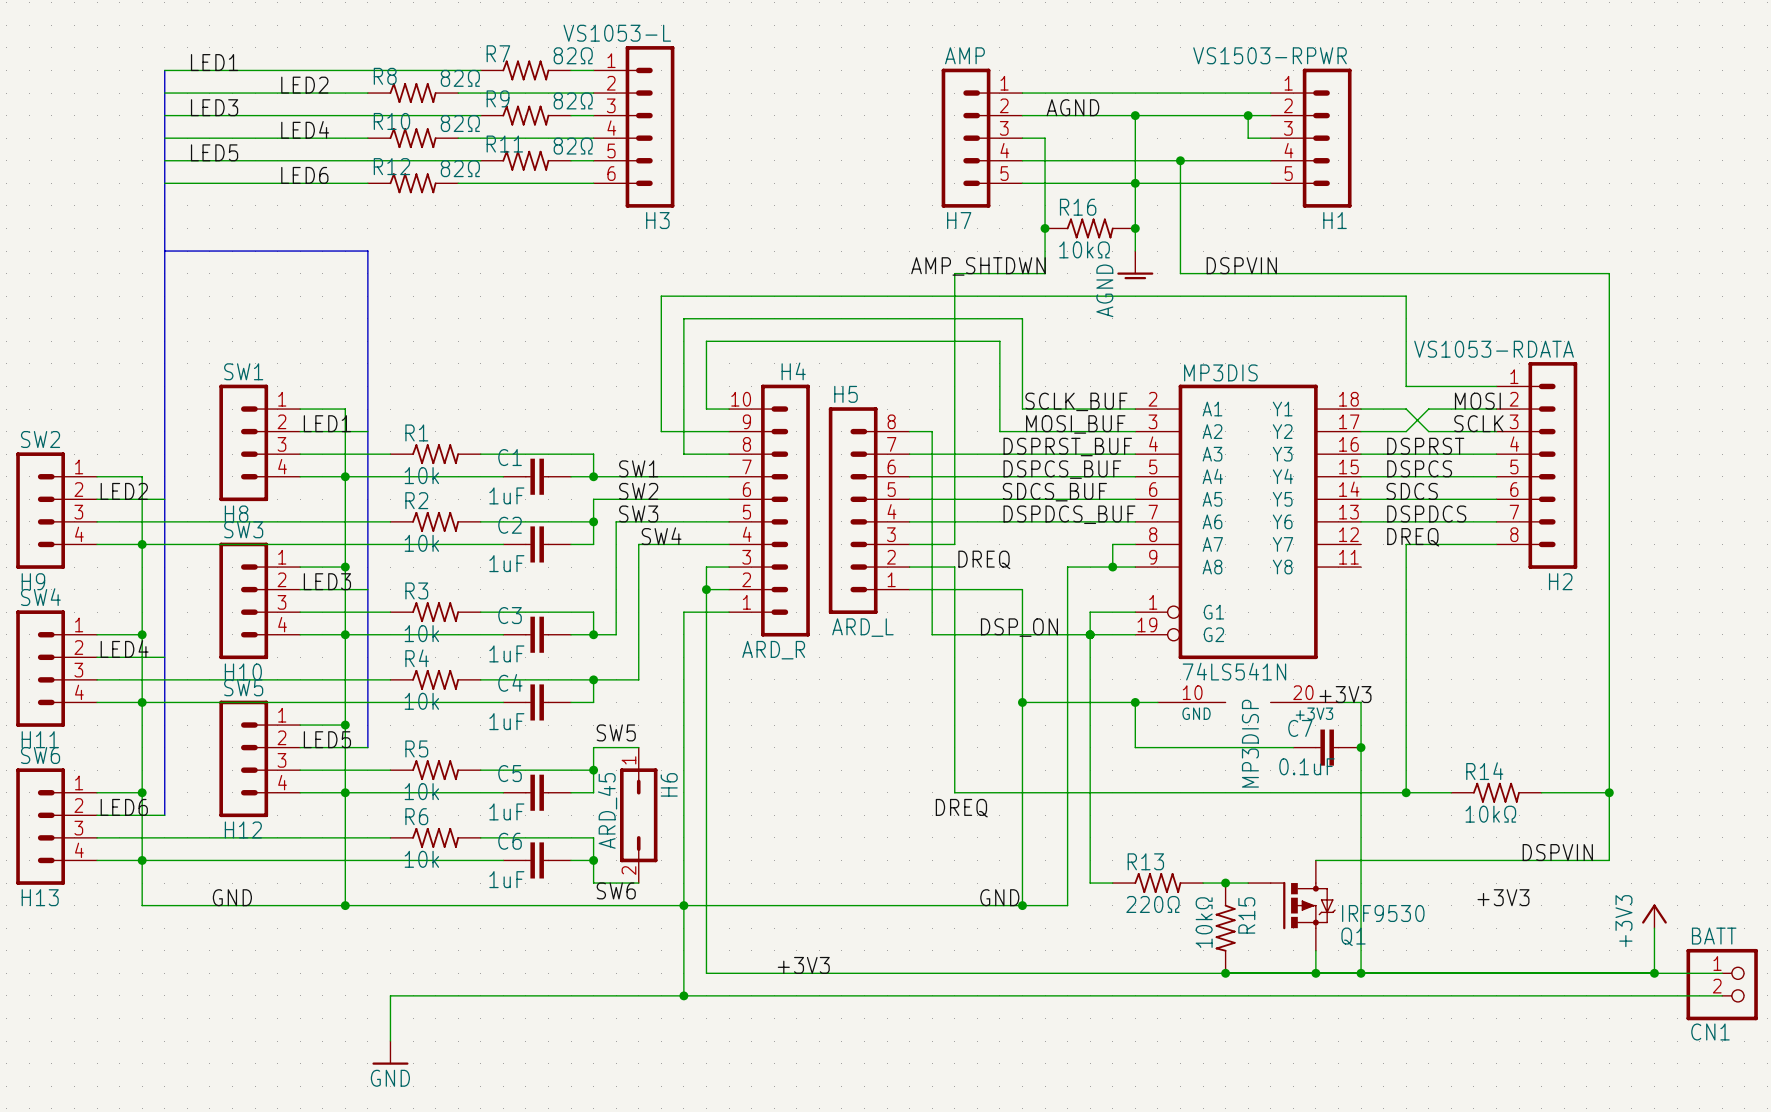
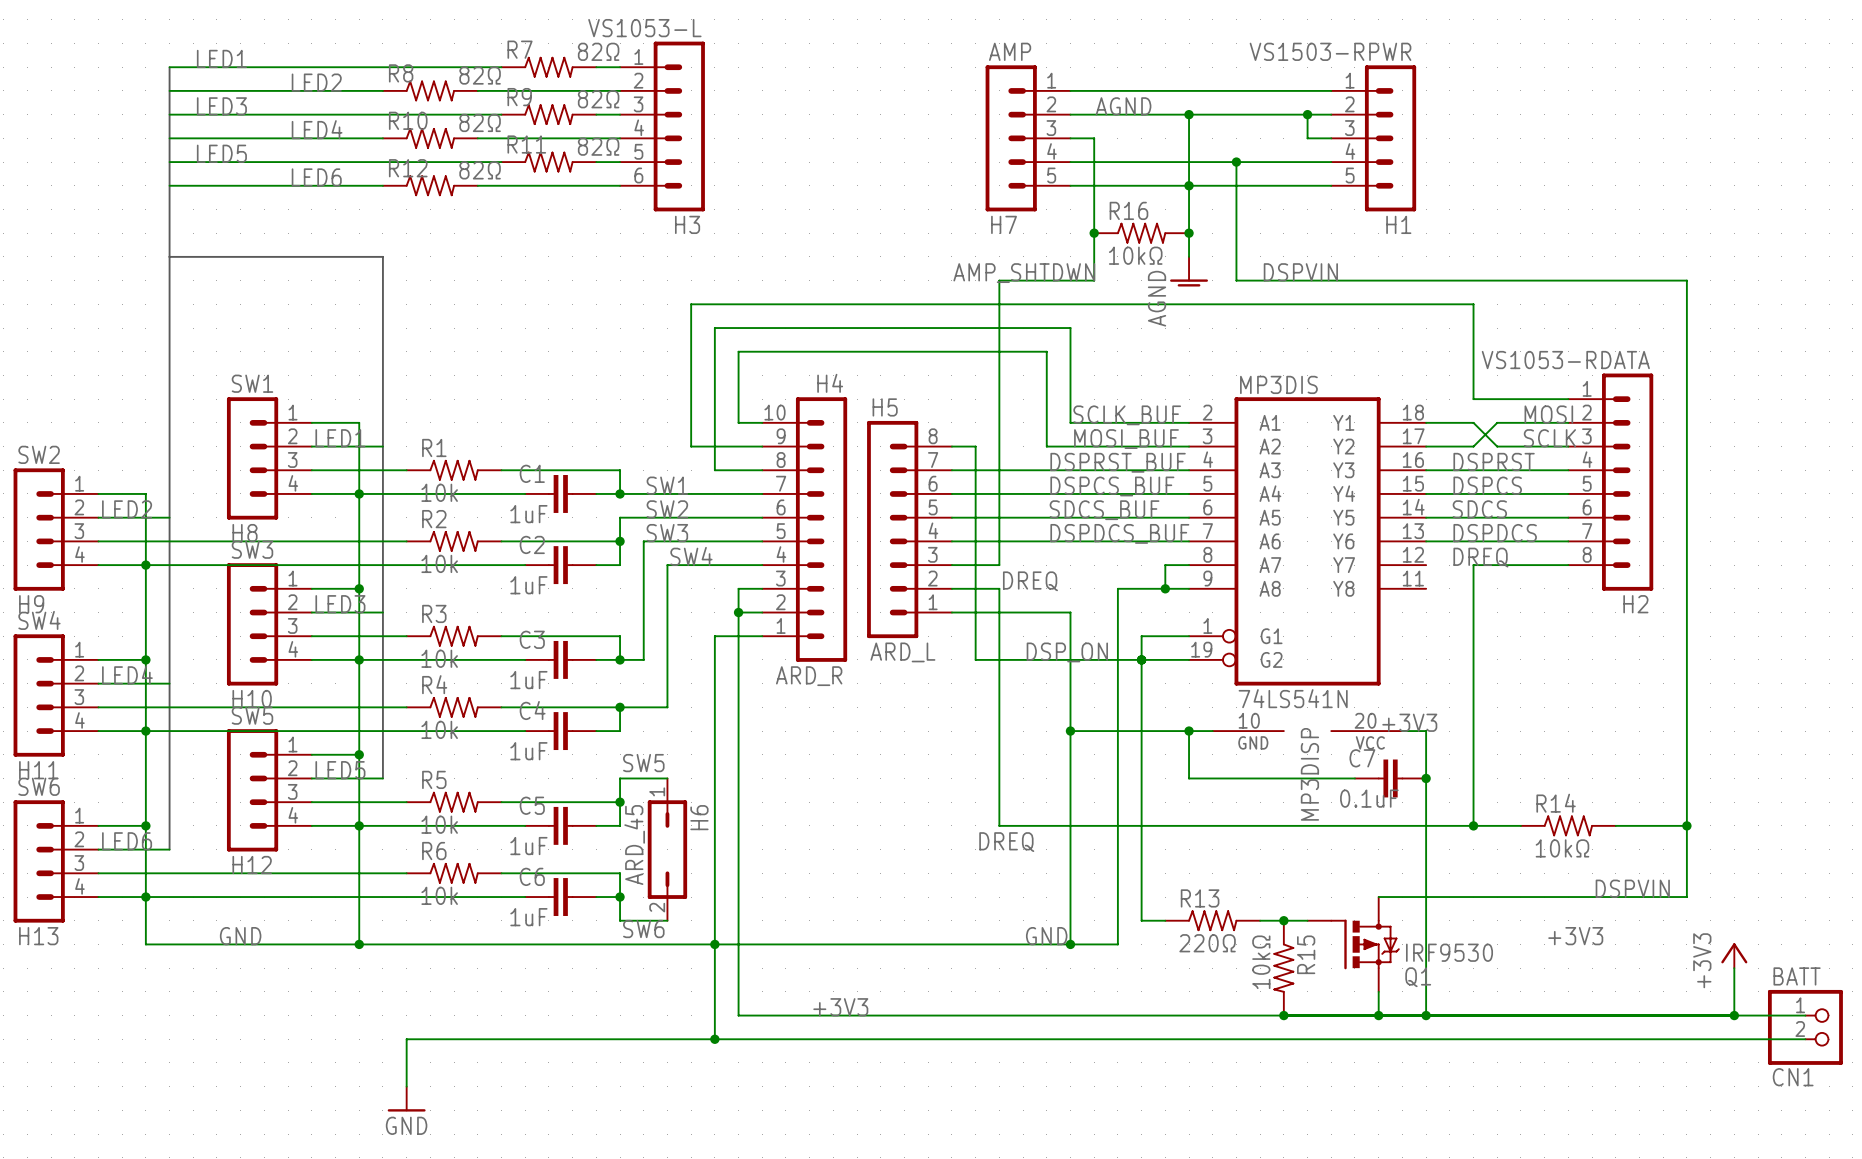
MP3DISP text: +3V3 (1314, 713) -> VCC (1370, 742)

